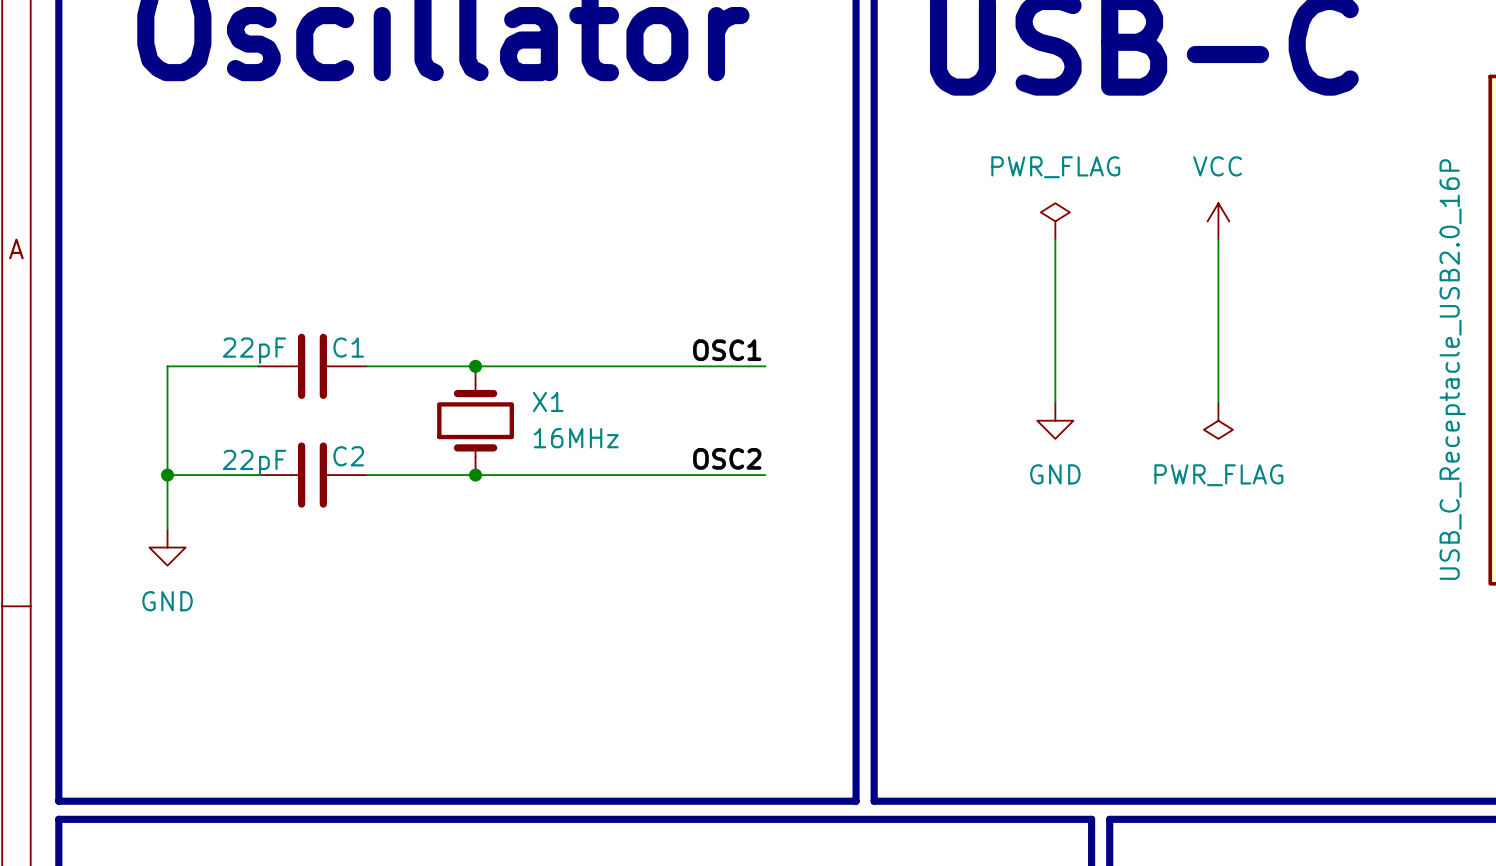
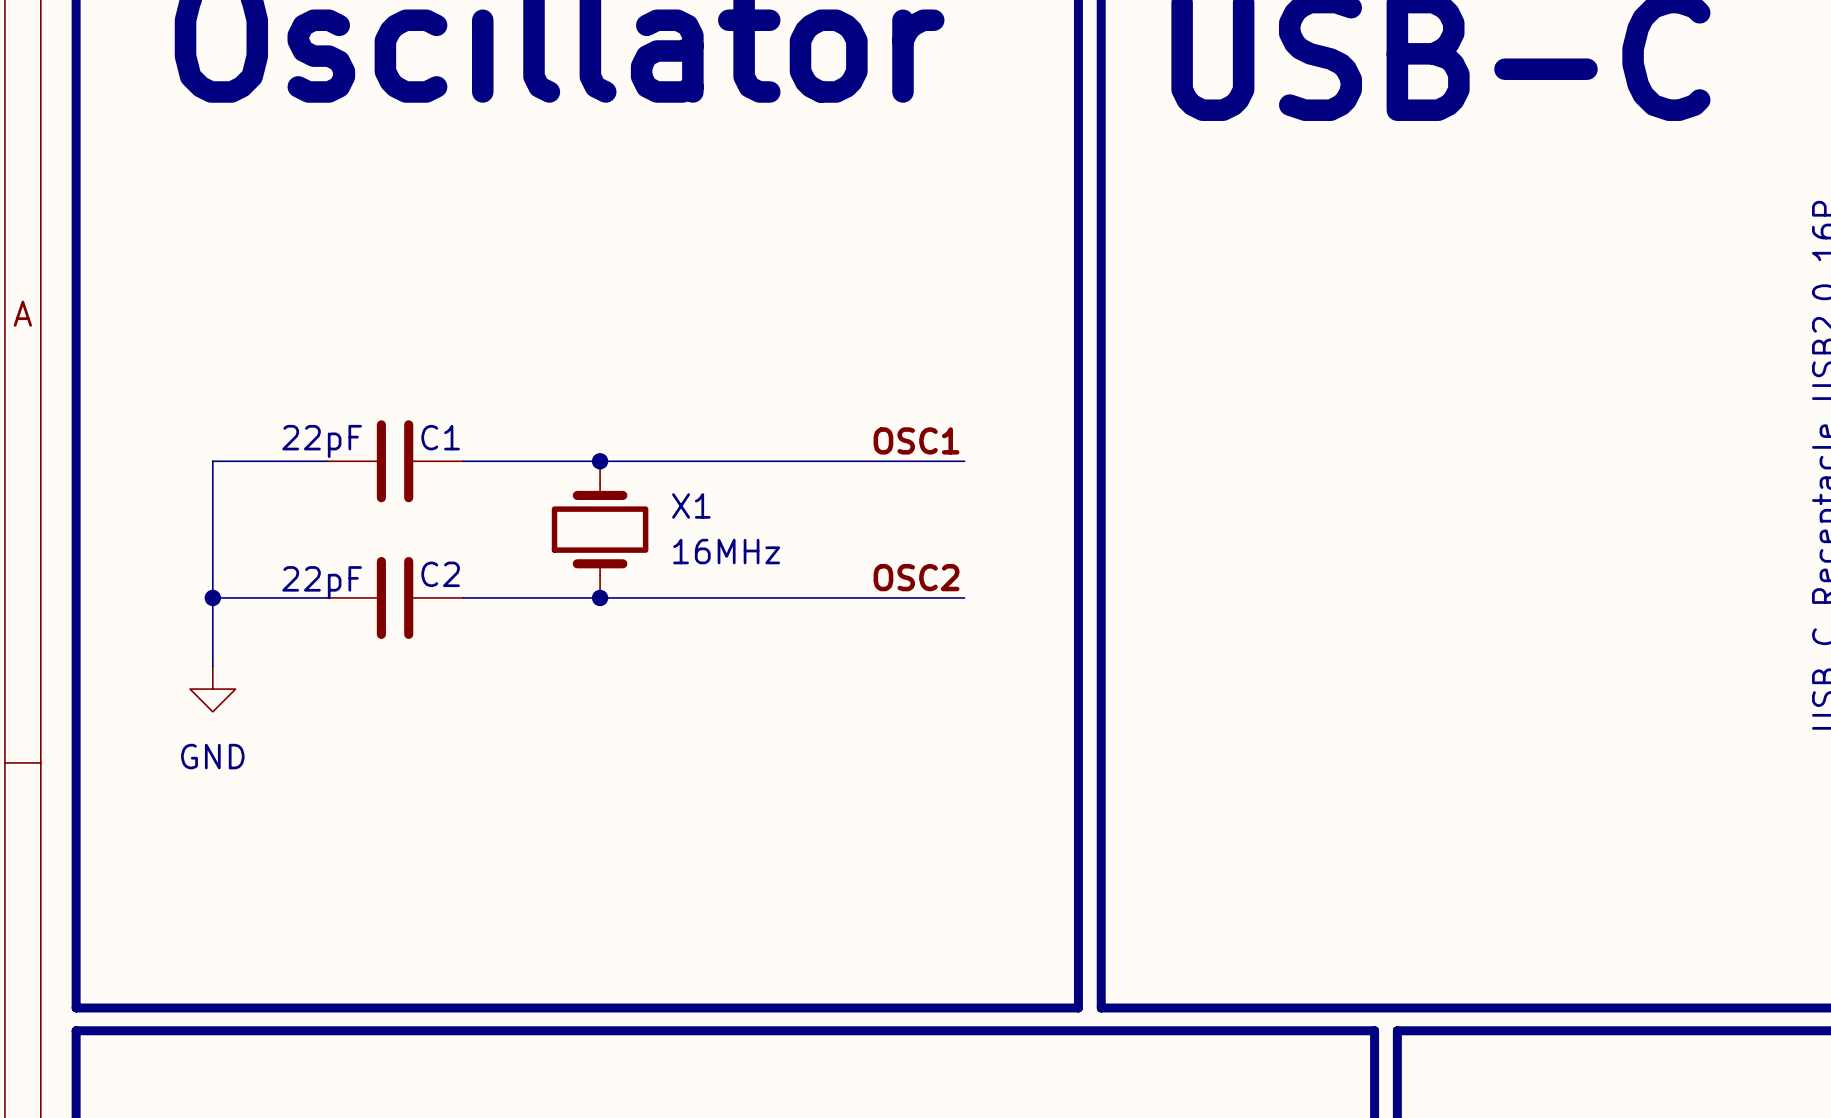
power symbol: PWR_FLAG (1055, 221) -> none
power symbol: VCC (1218, 221) -> none
wire: (1055, 239) (1055, 402) -> none
wire: (1218, 239) (1218, 402) -> none
power symbol: GND (1055, 420) -> none
power symbol: PWR_FLAG (1218, 420) -> none

